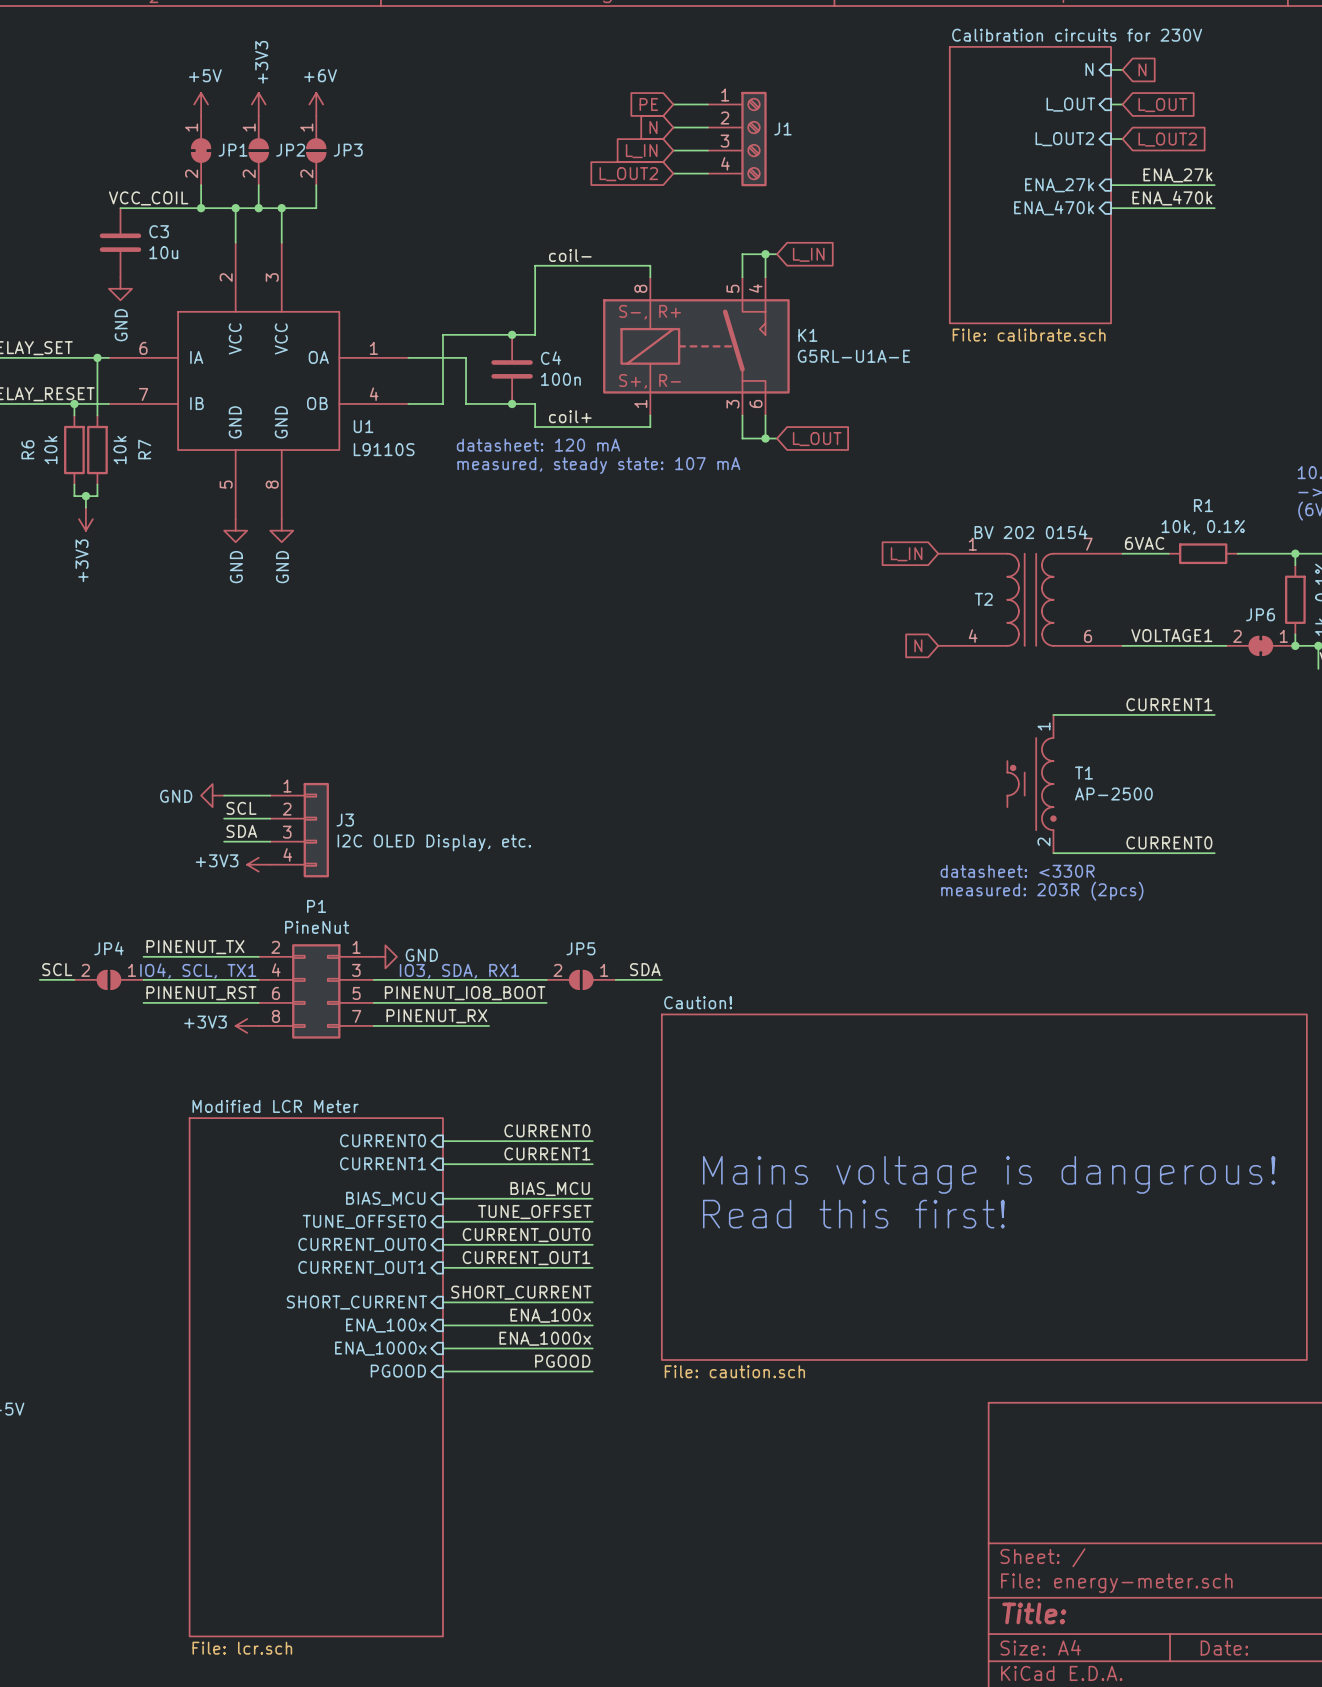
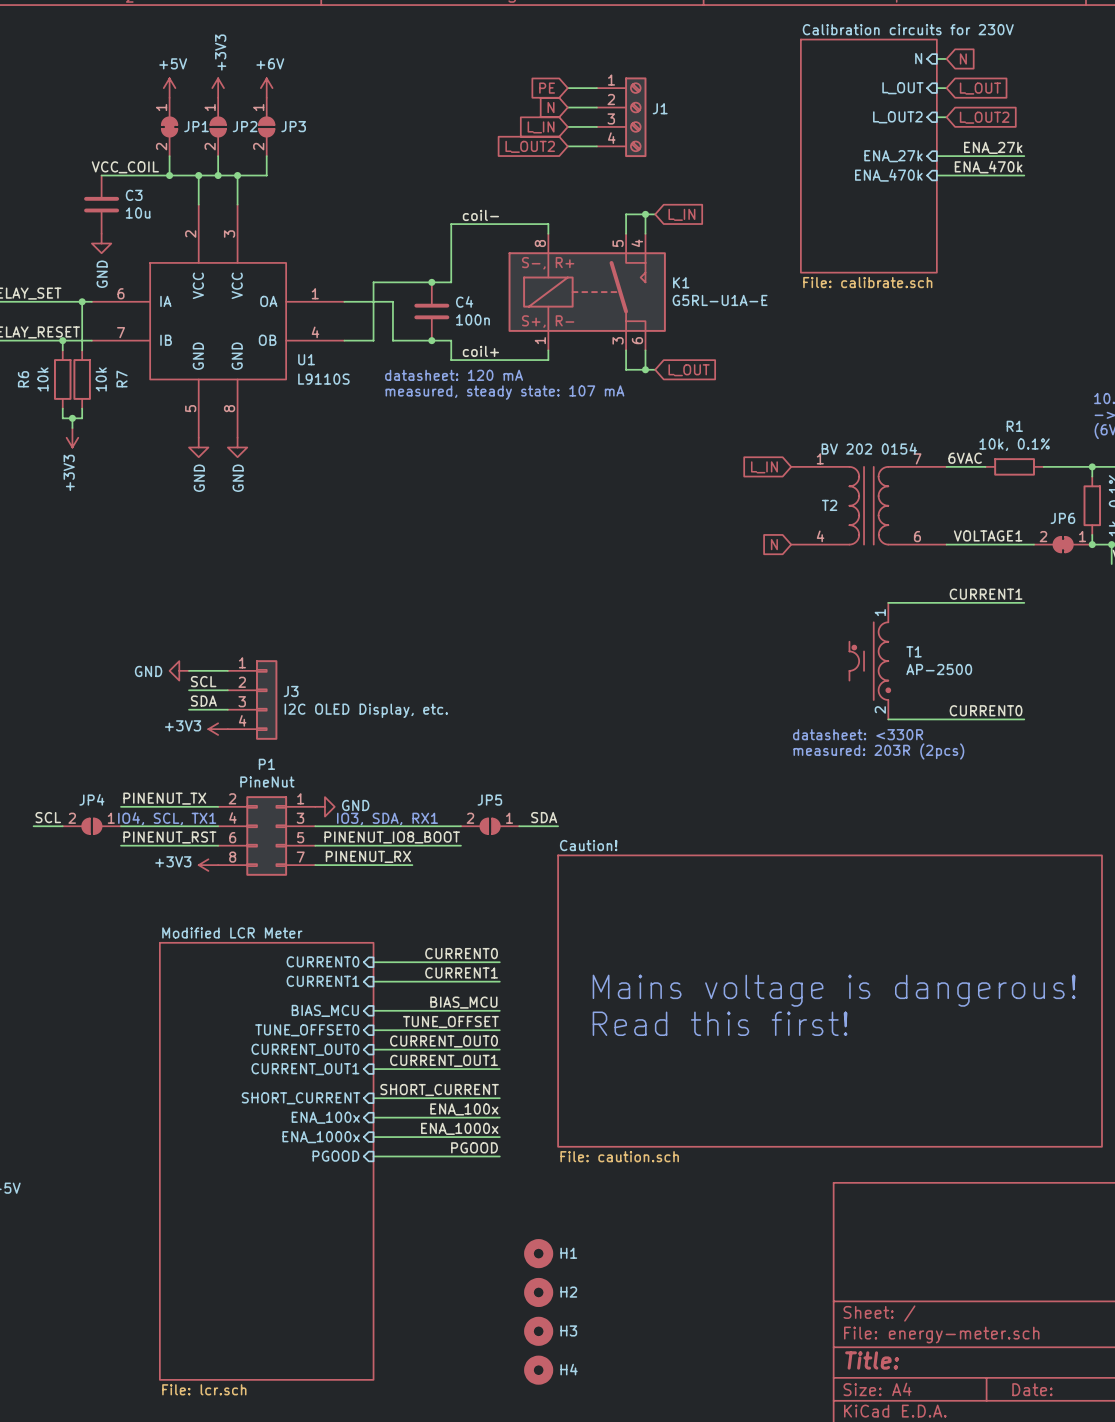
H1: none -> (538, 1253)
H2: none -> (538, 1292)
H3: none -> (538, 1331)
H4: none -> (538, 1370)

